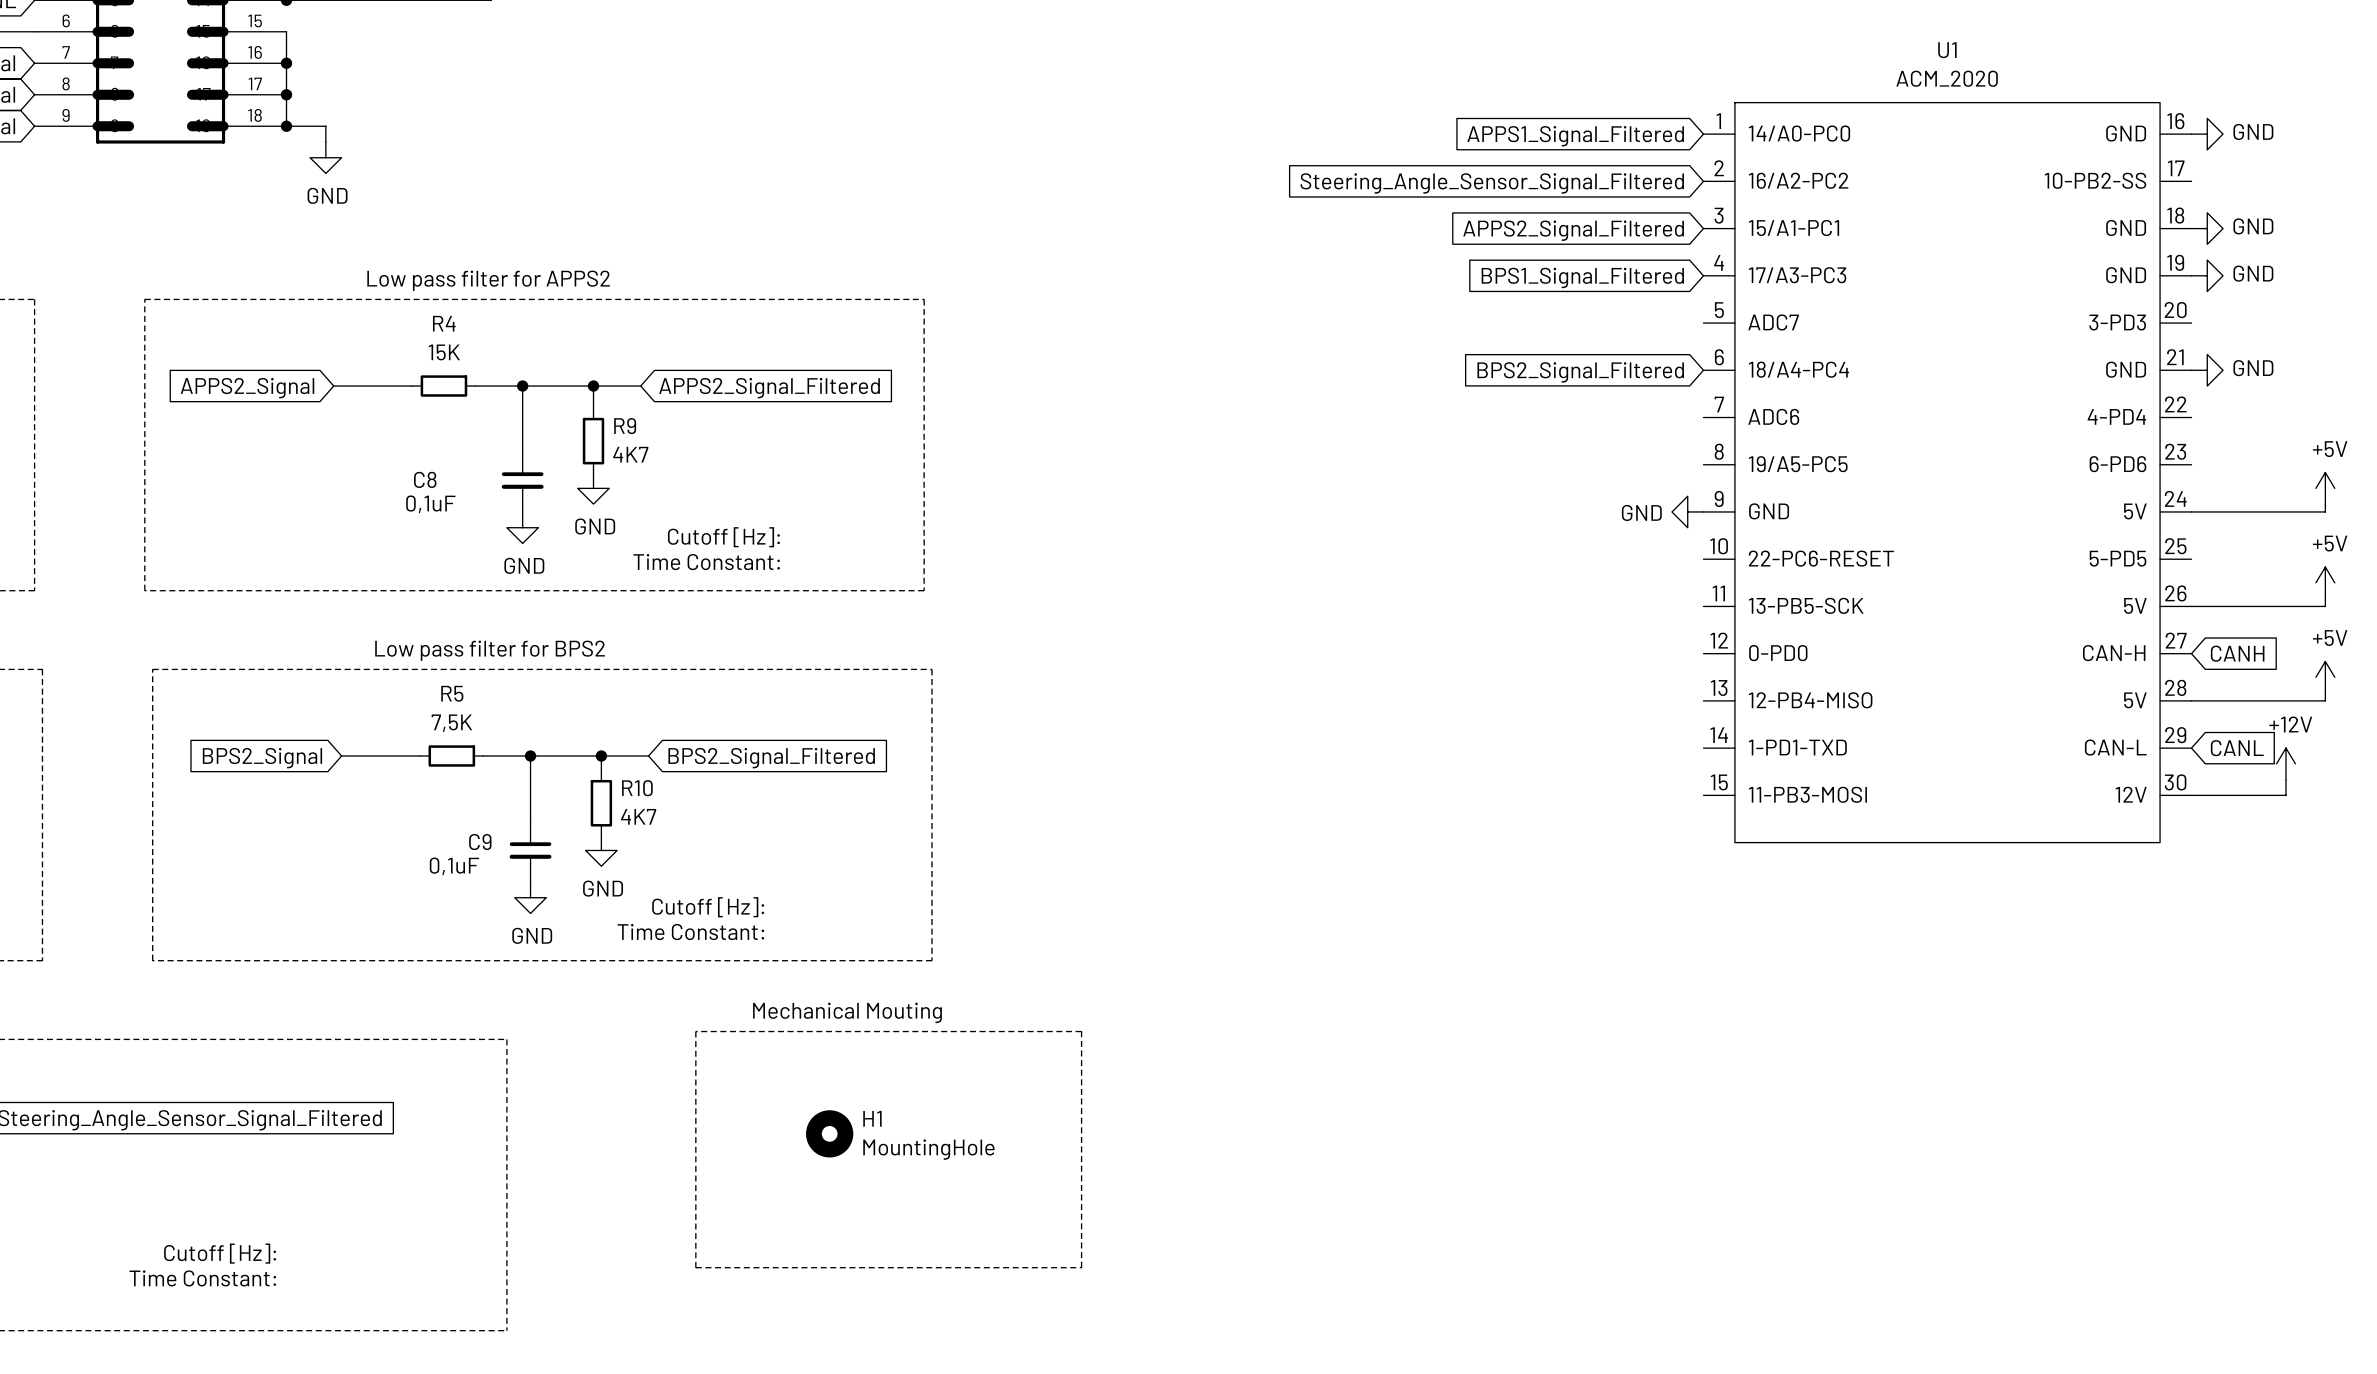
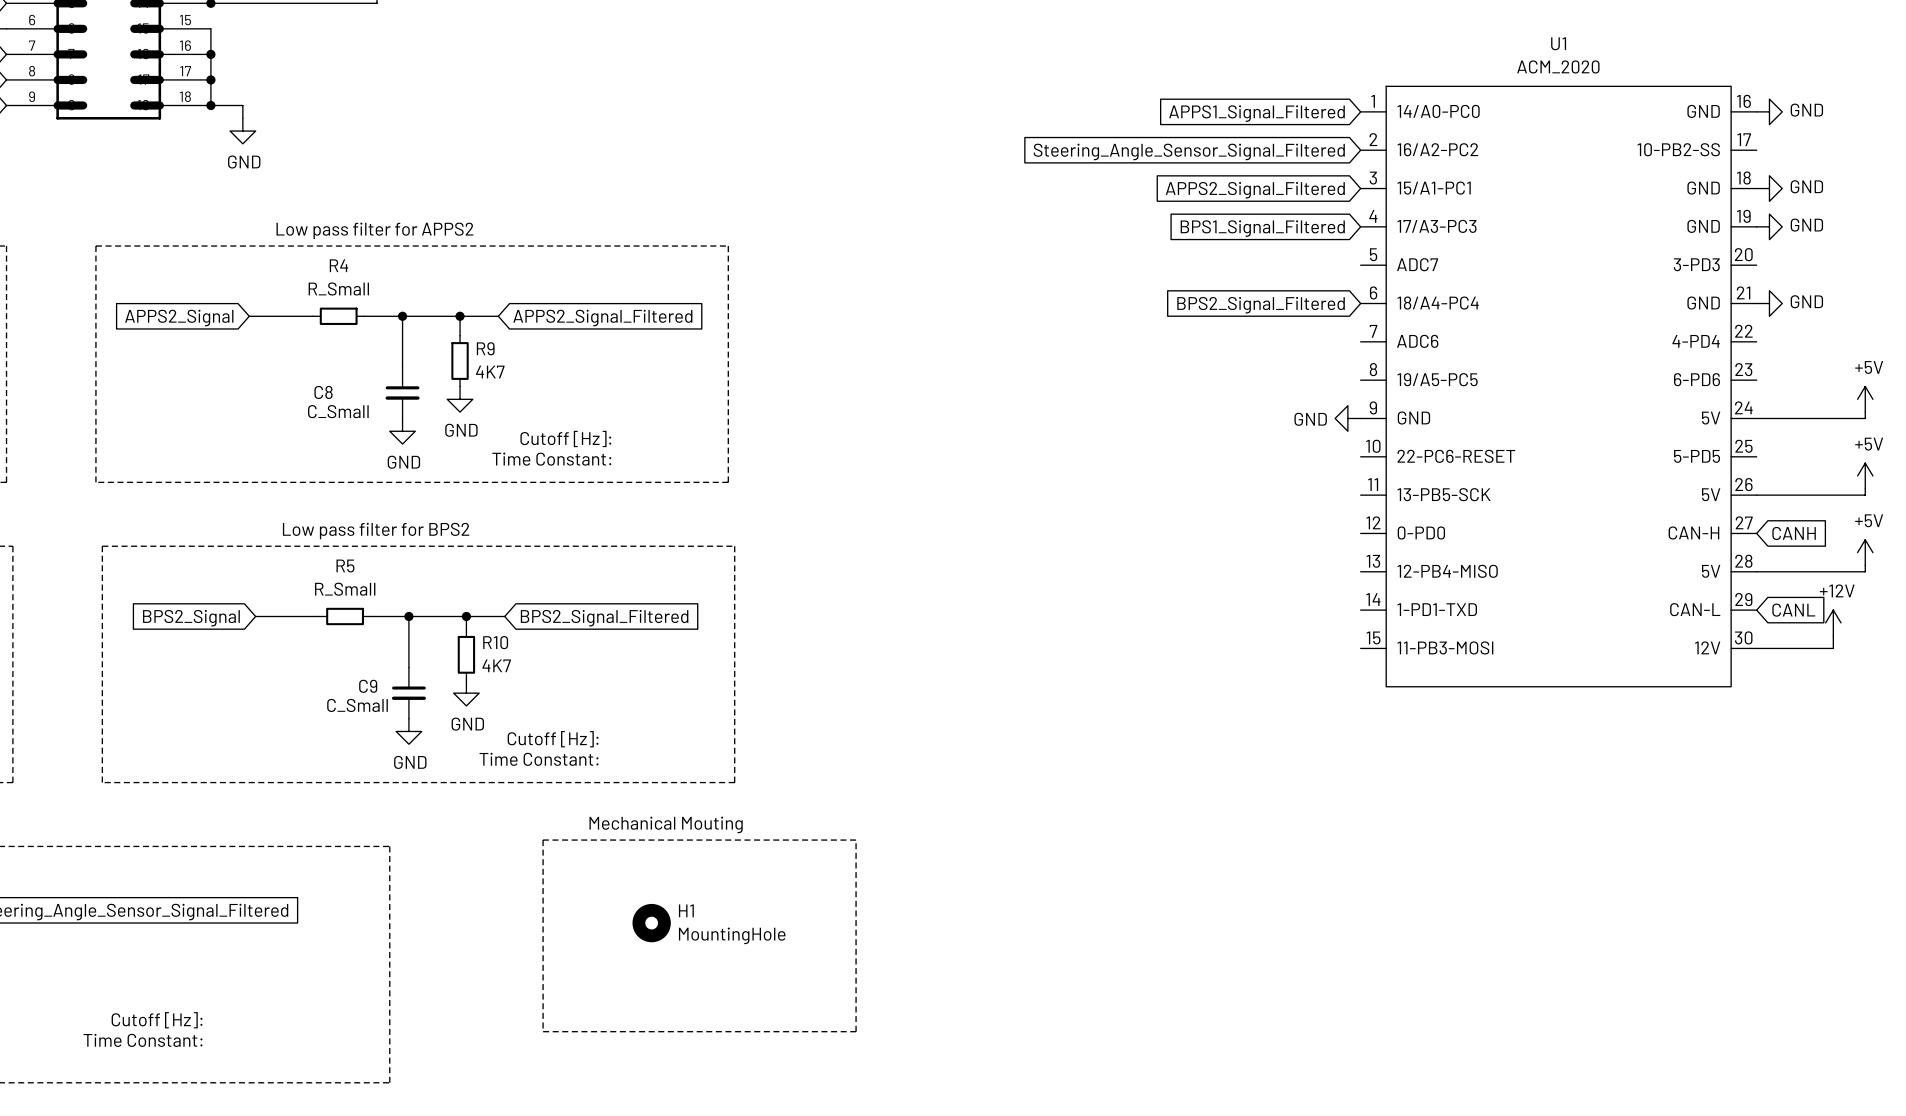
R4 value: 15K (444, 352) -> R_Small (338, 288)
C8 value: 0,1uF (430, 504) -> C_Small (338, 411)
R5 value: 7,5K (451, 723) -> R_Small (345, 589)
C9 value: 0,1uF (454, 866) -> C_Small (357, 705)

